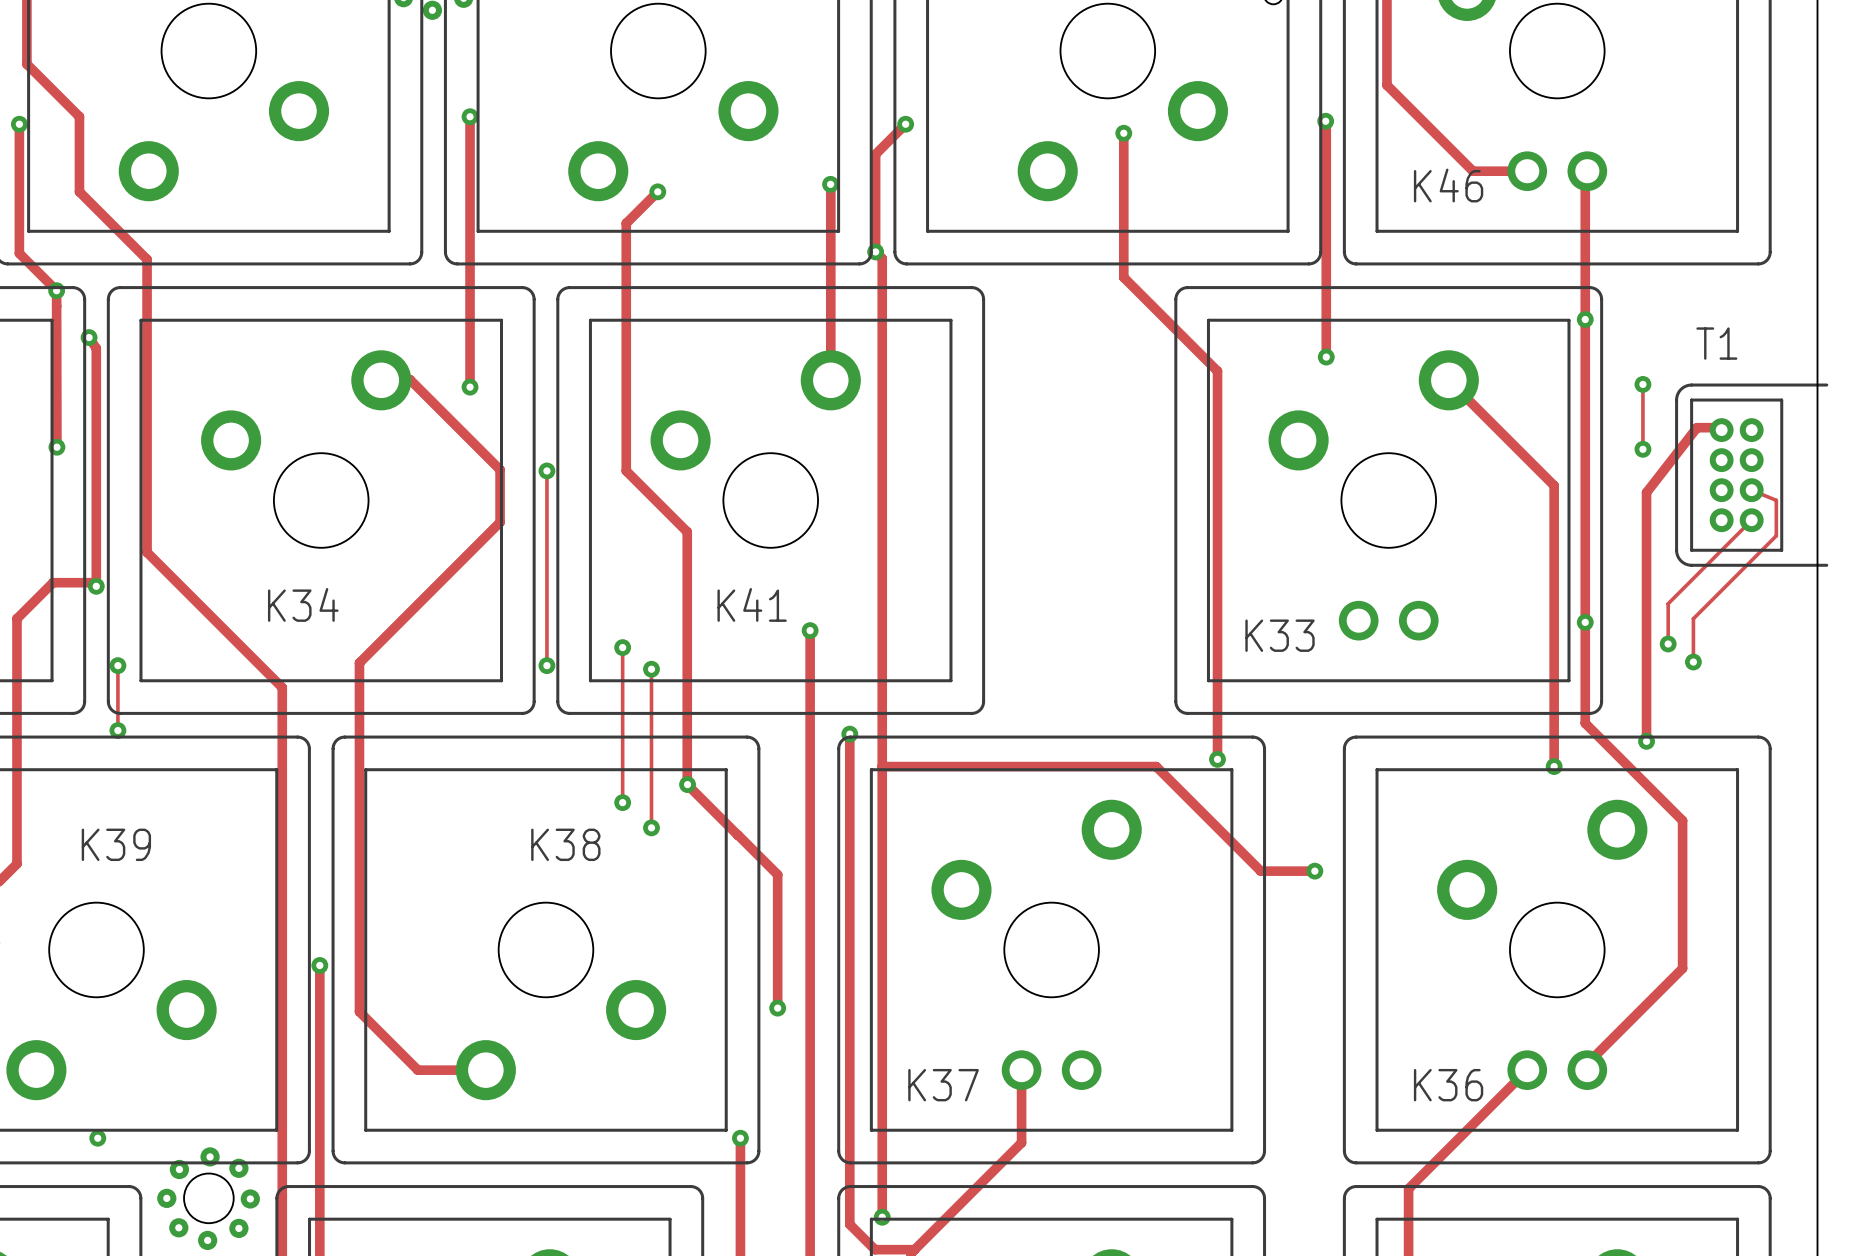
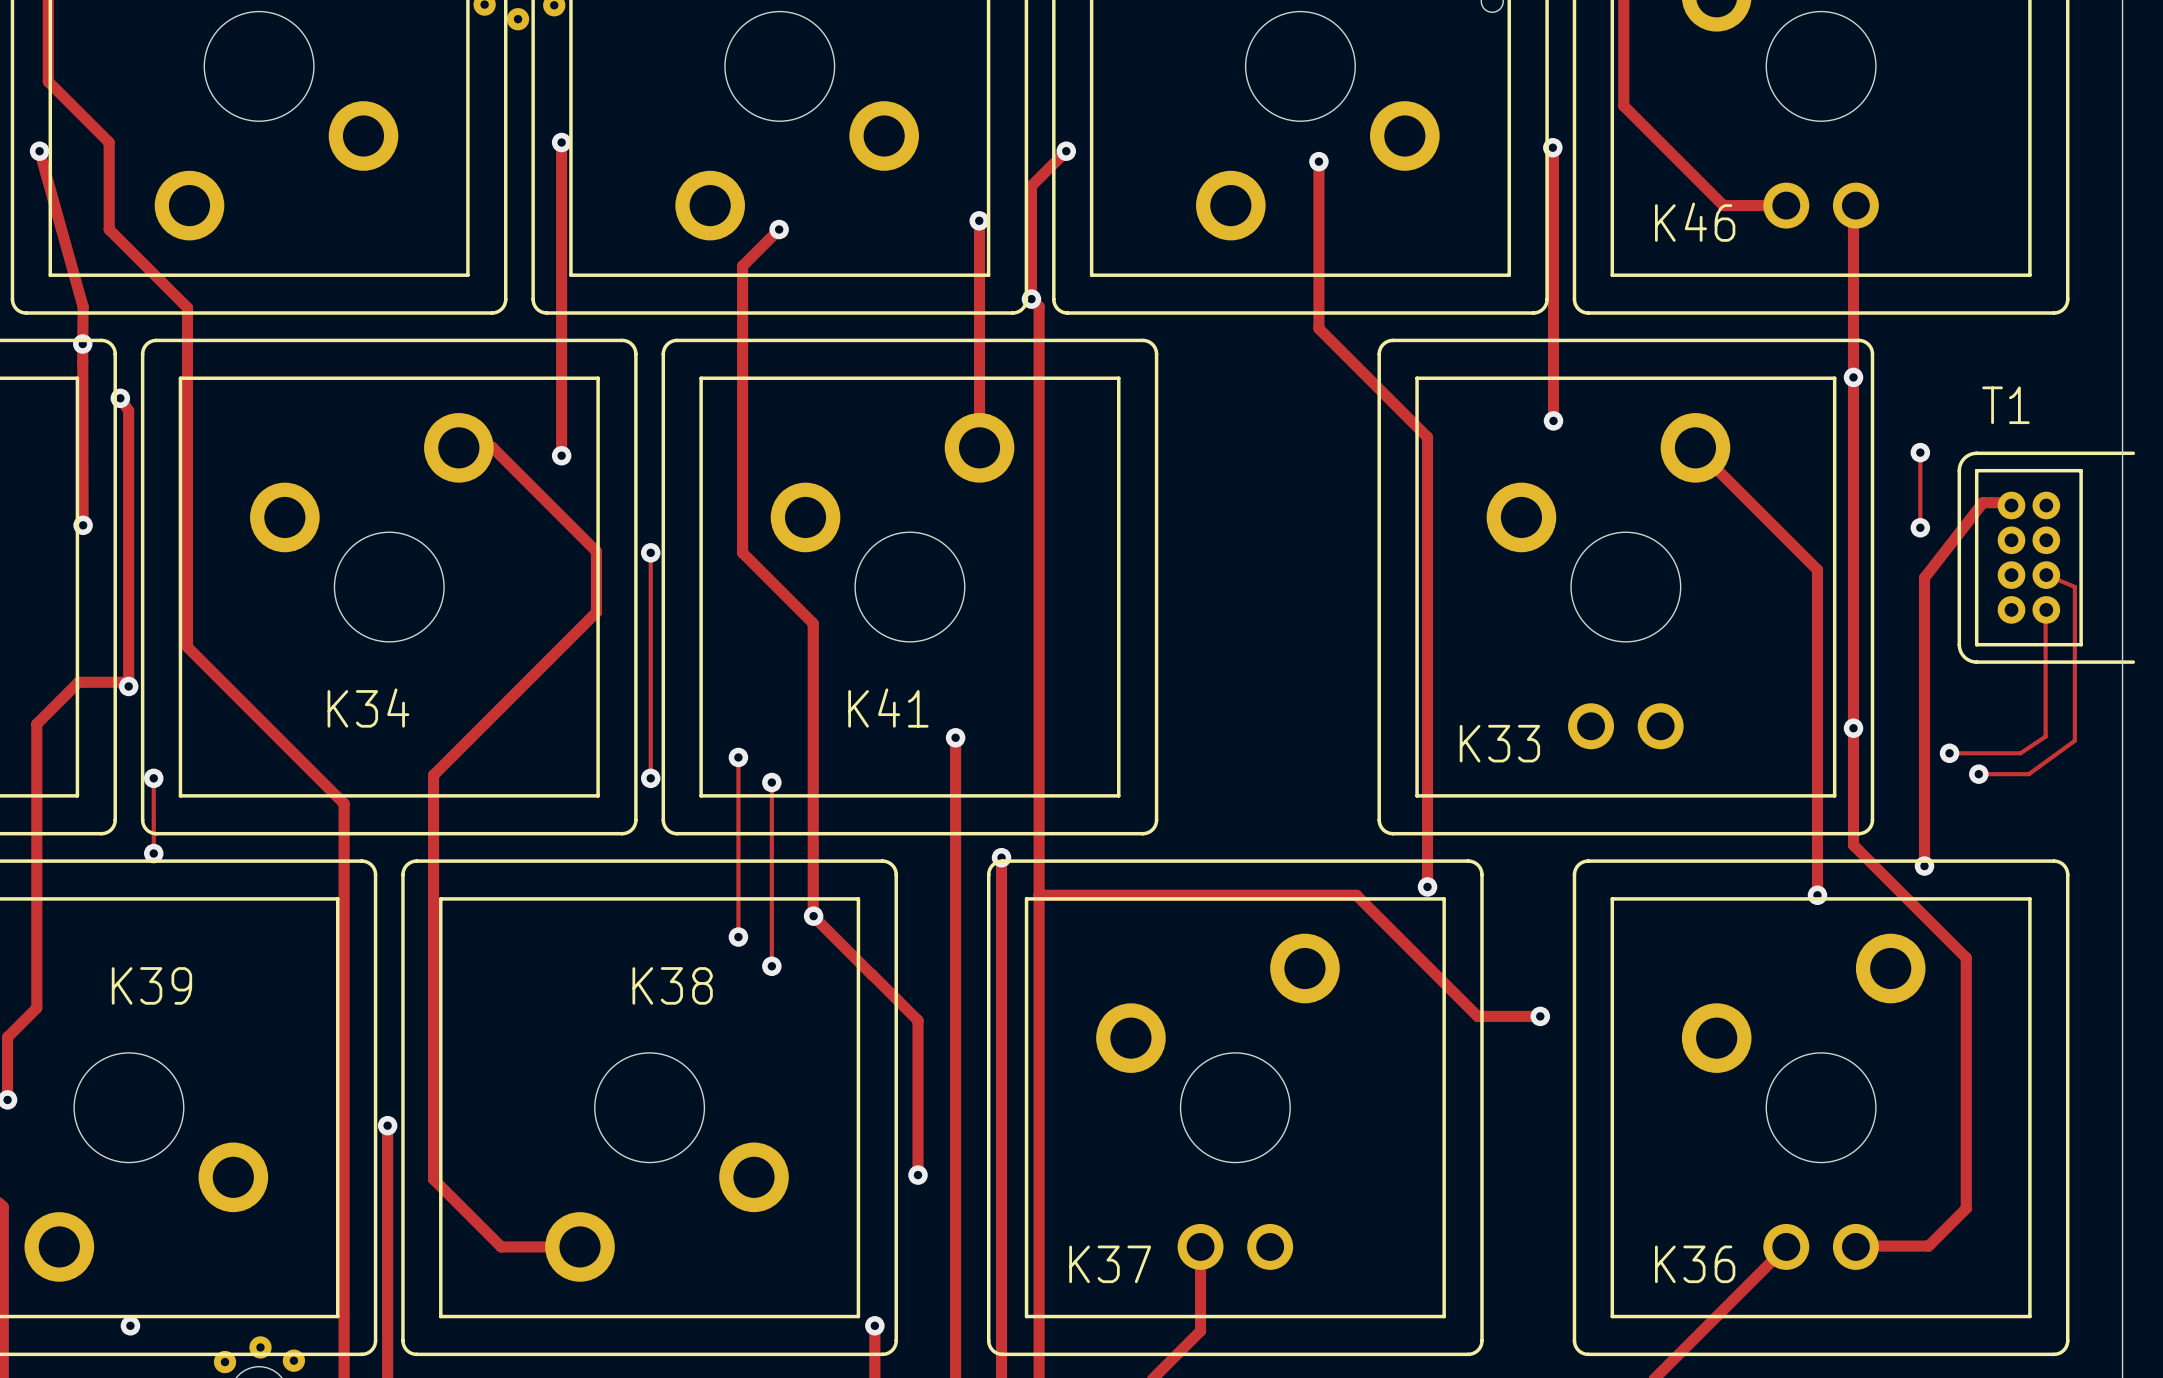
track: (19, 124) (19, 253) (56, 290) -> (39, 151) (83, 306) (82, 344)
track: (1751, 520) (1668, 603) (1668, 644) -> (2045, 618) (2045, 736) (2020, 753) (1949, 753)
track: (1776, 535) (1693, 618) (1693, 662) -> (2074, 628) (2074, 740) (2028, 774) (1978, 774)
track: (1682, 968) (1587, 1063) (1587, 1070) -> (1966, 1129) (1966, 1208) (1928, 1246) (1855, 1246)

